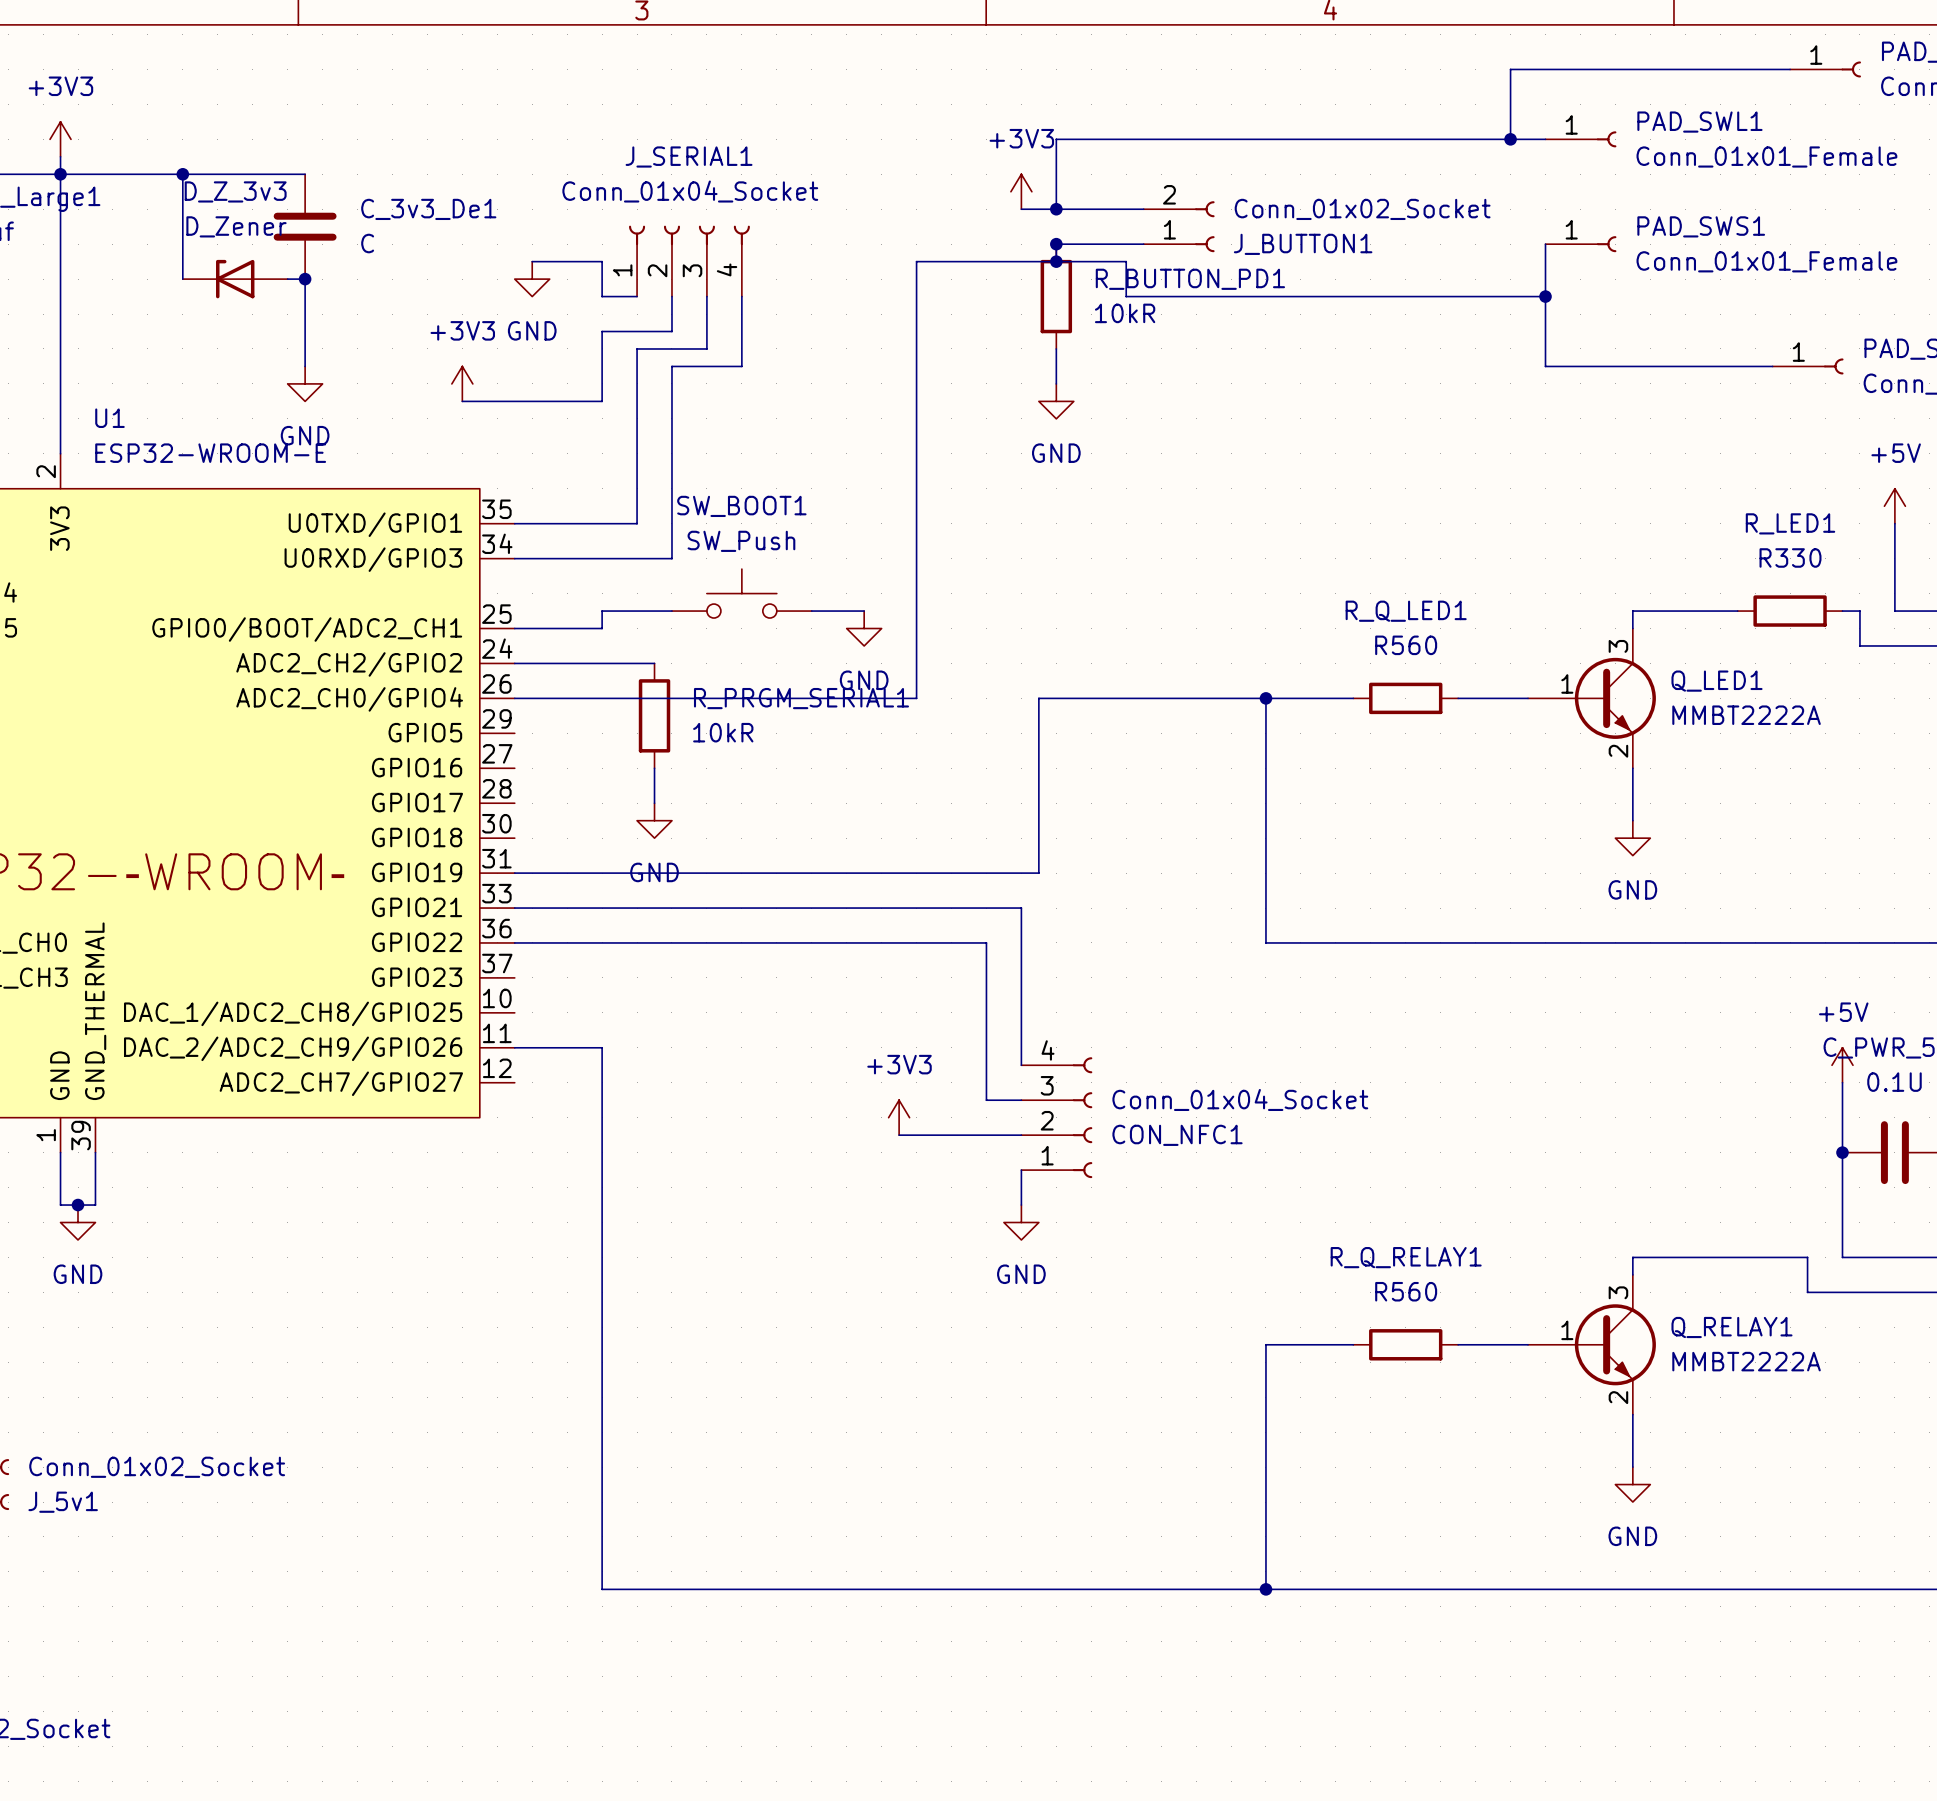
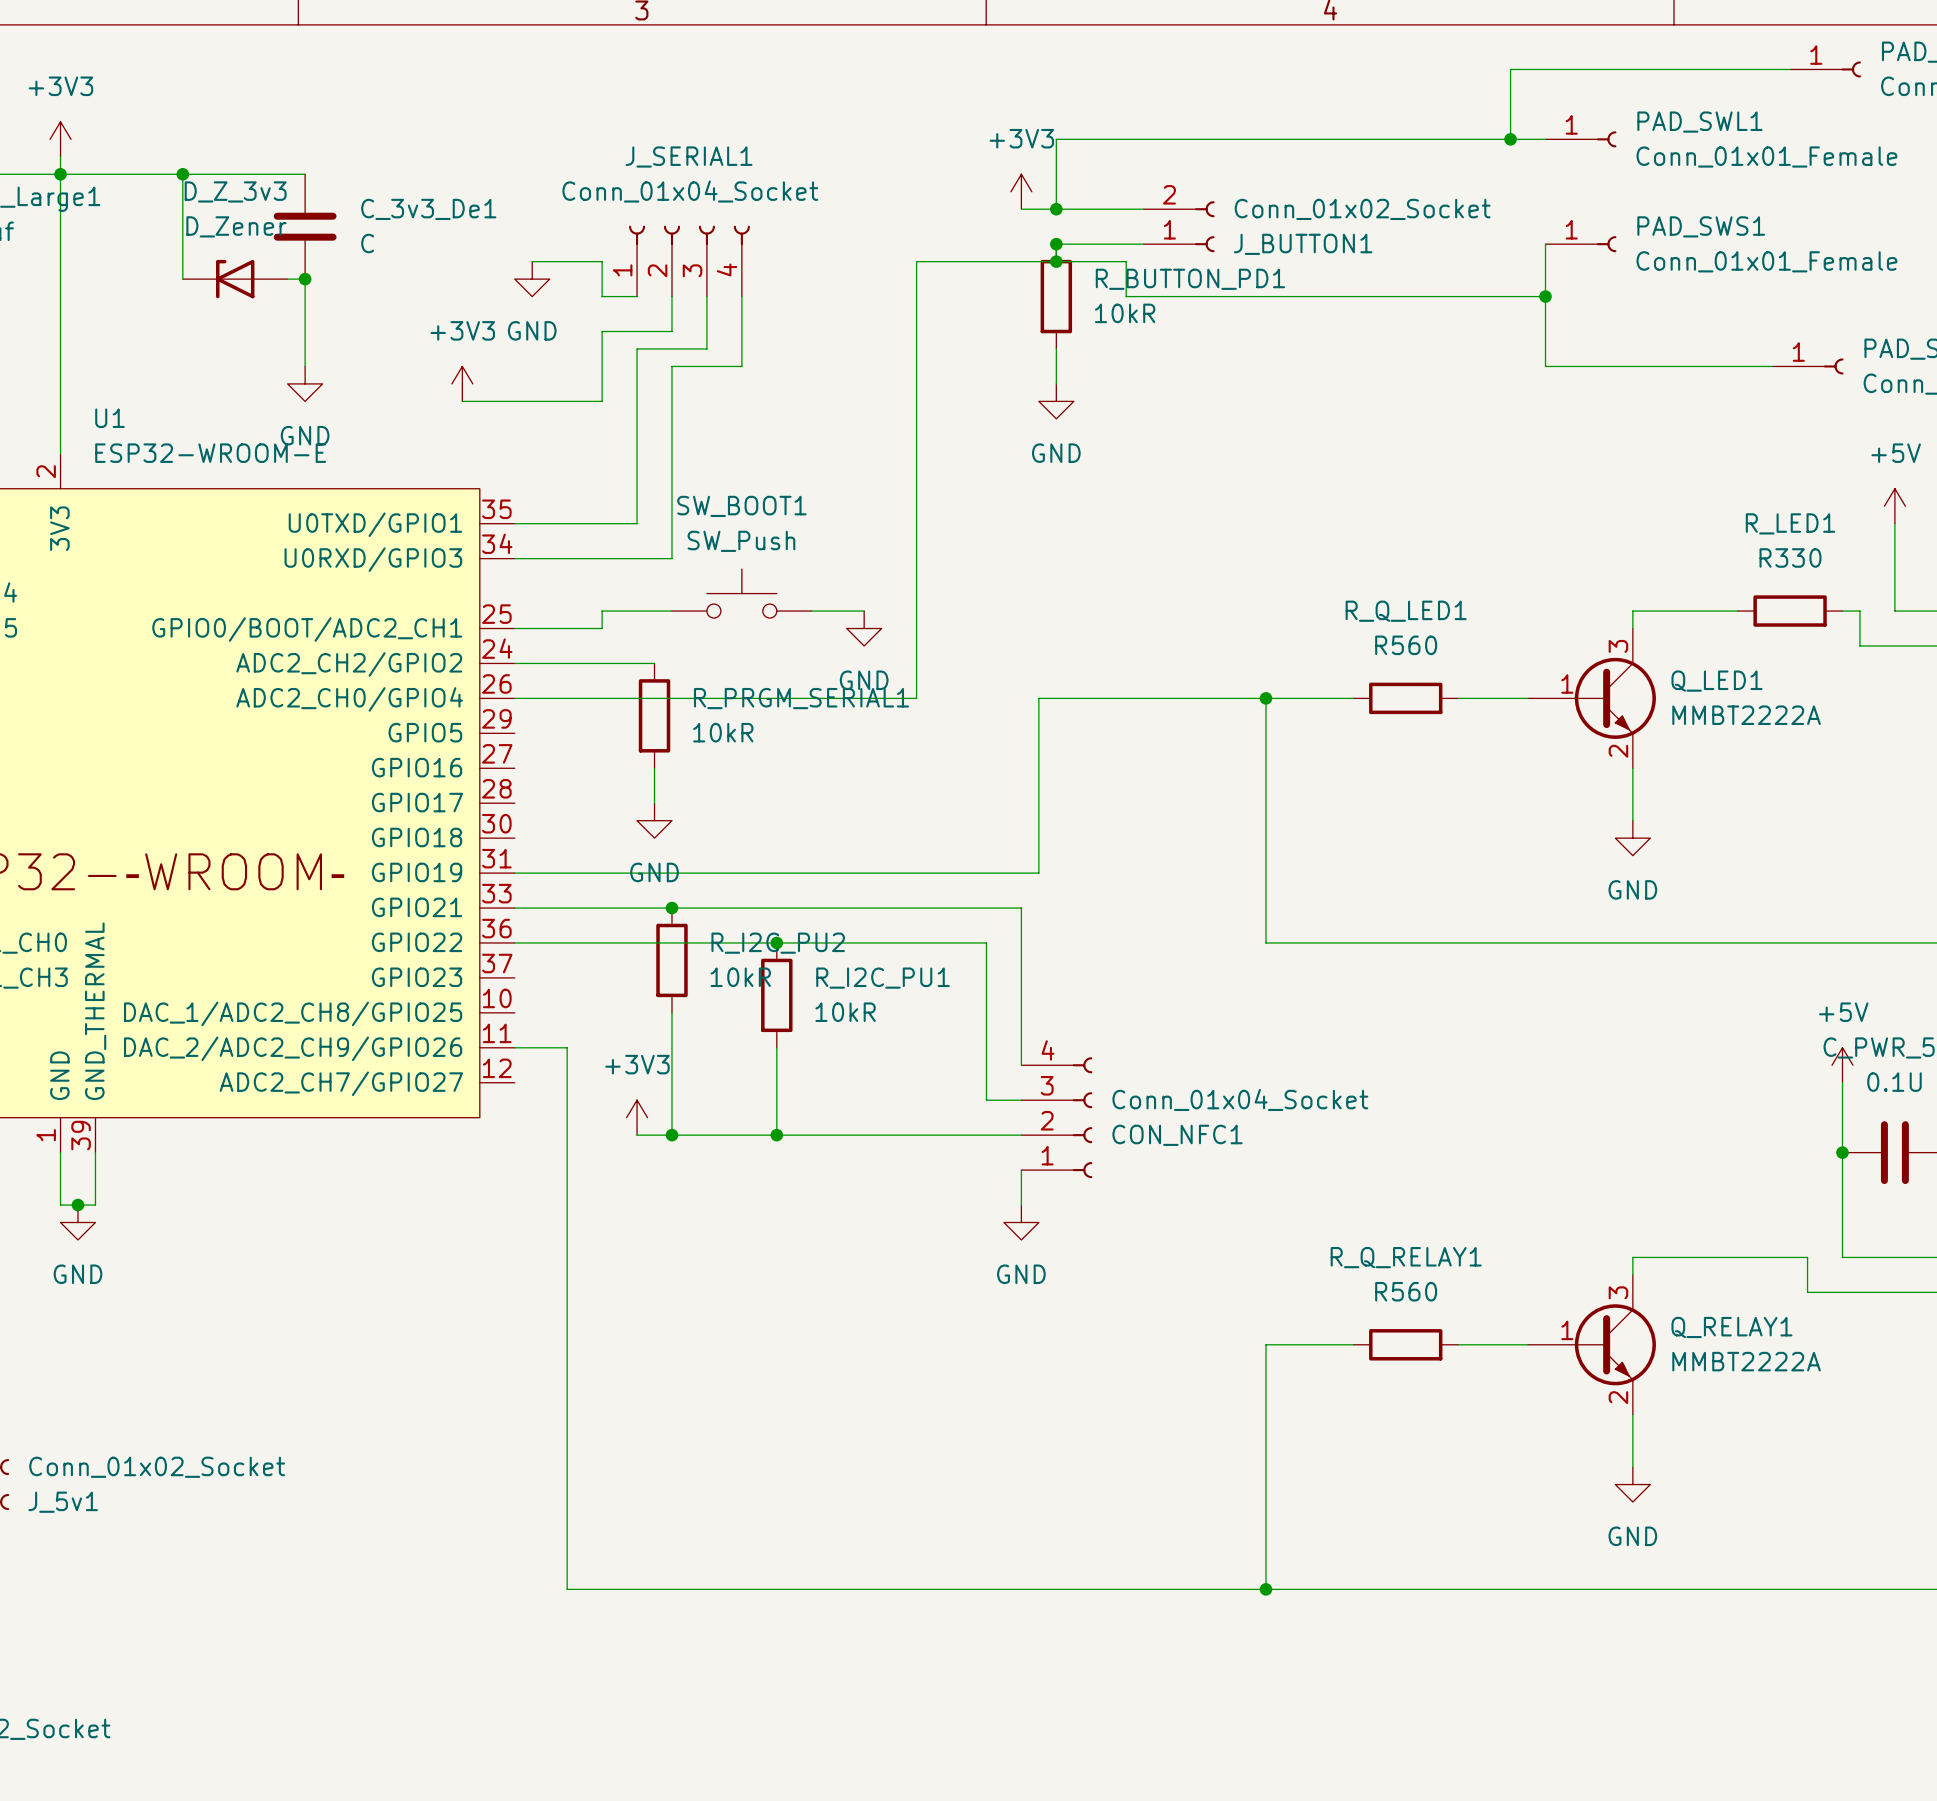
junction: none -> (671, 908)
junction: none -> (776, 942)
R_I2C_PU2: none -> 10kR (671, 960)
R_I2C_PU1: none -> 10kR (776, 995)
wire: none -> (671, 1012) (671, 1135)
wire: (567, 1047) (602, 1047) (602, 1589) -> (567, 1047) (567, 1589) (602, 1589)
wire: none -> (776, 1047) (776, 1135)
power symbol position: +3V3 (899, 1117) -> +3V3 (637, 1117)
wire: none -> (637, 1135) (899, 1135)
junction: none -> (671, 1135)
junction: none -> (776, 1135)

